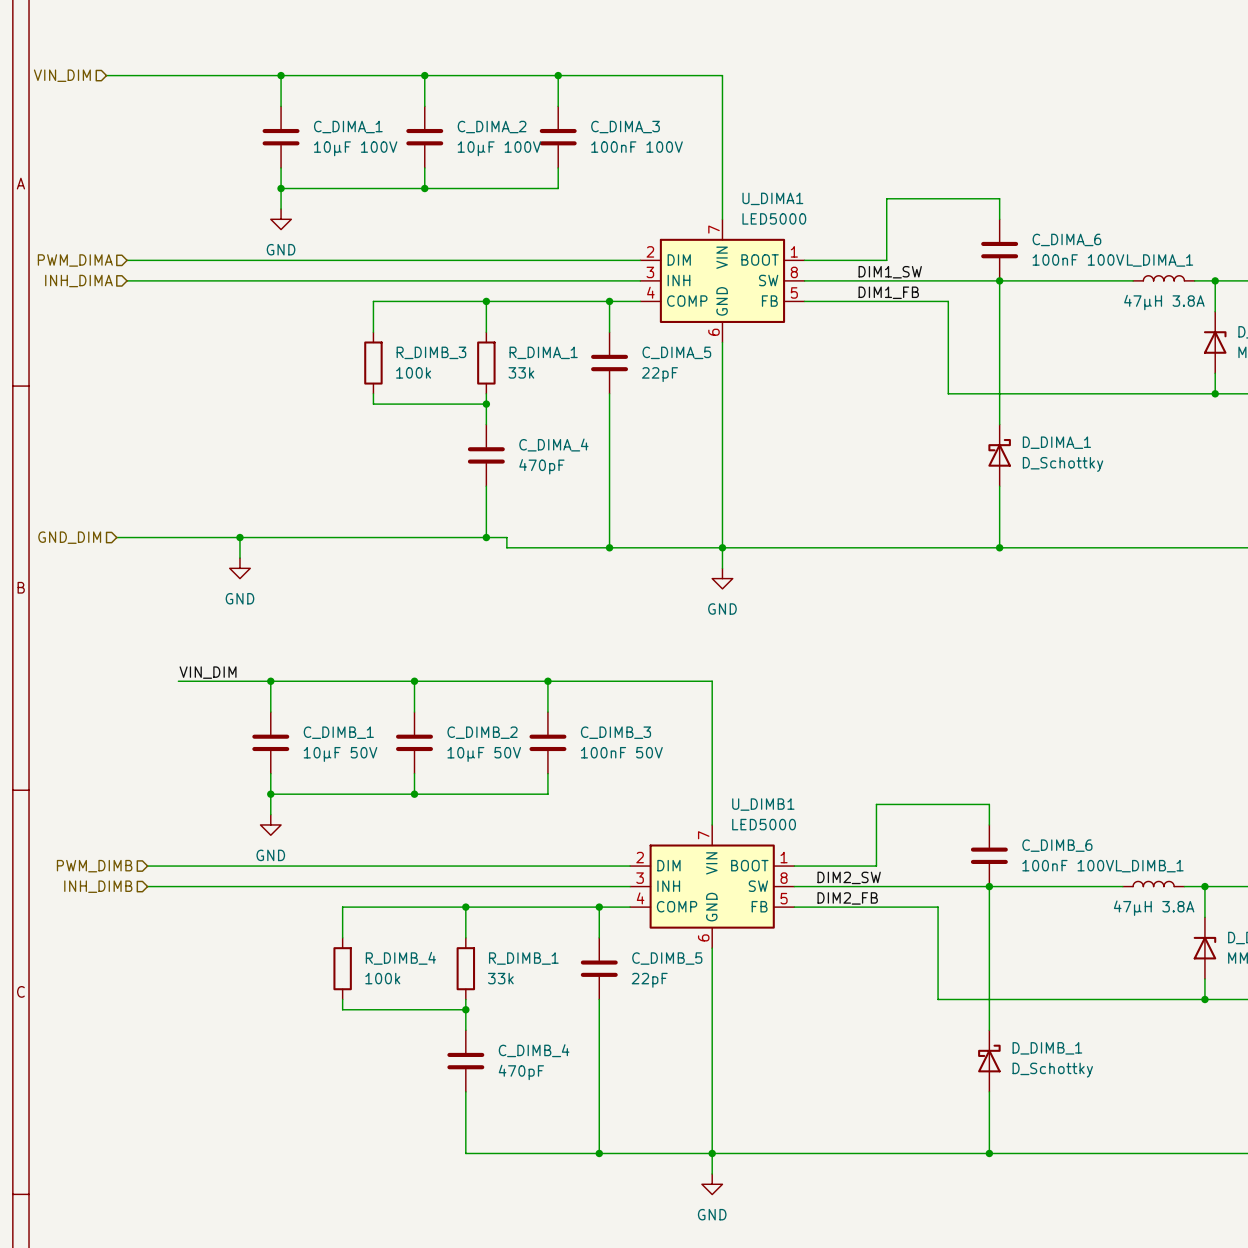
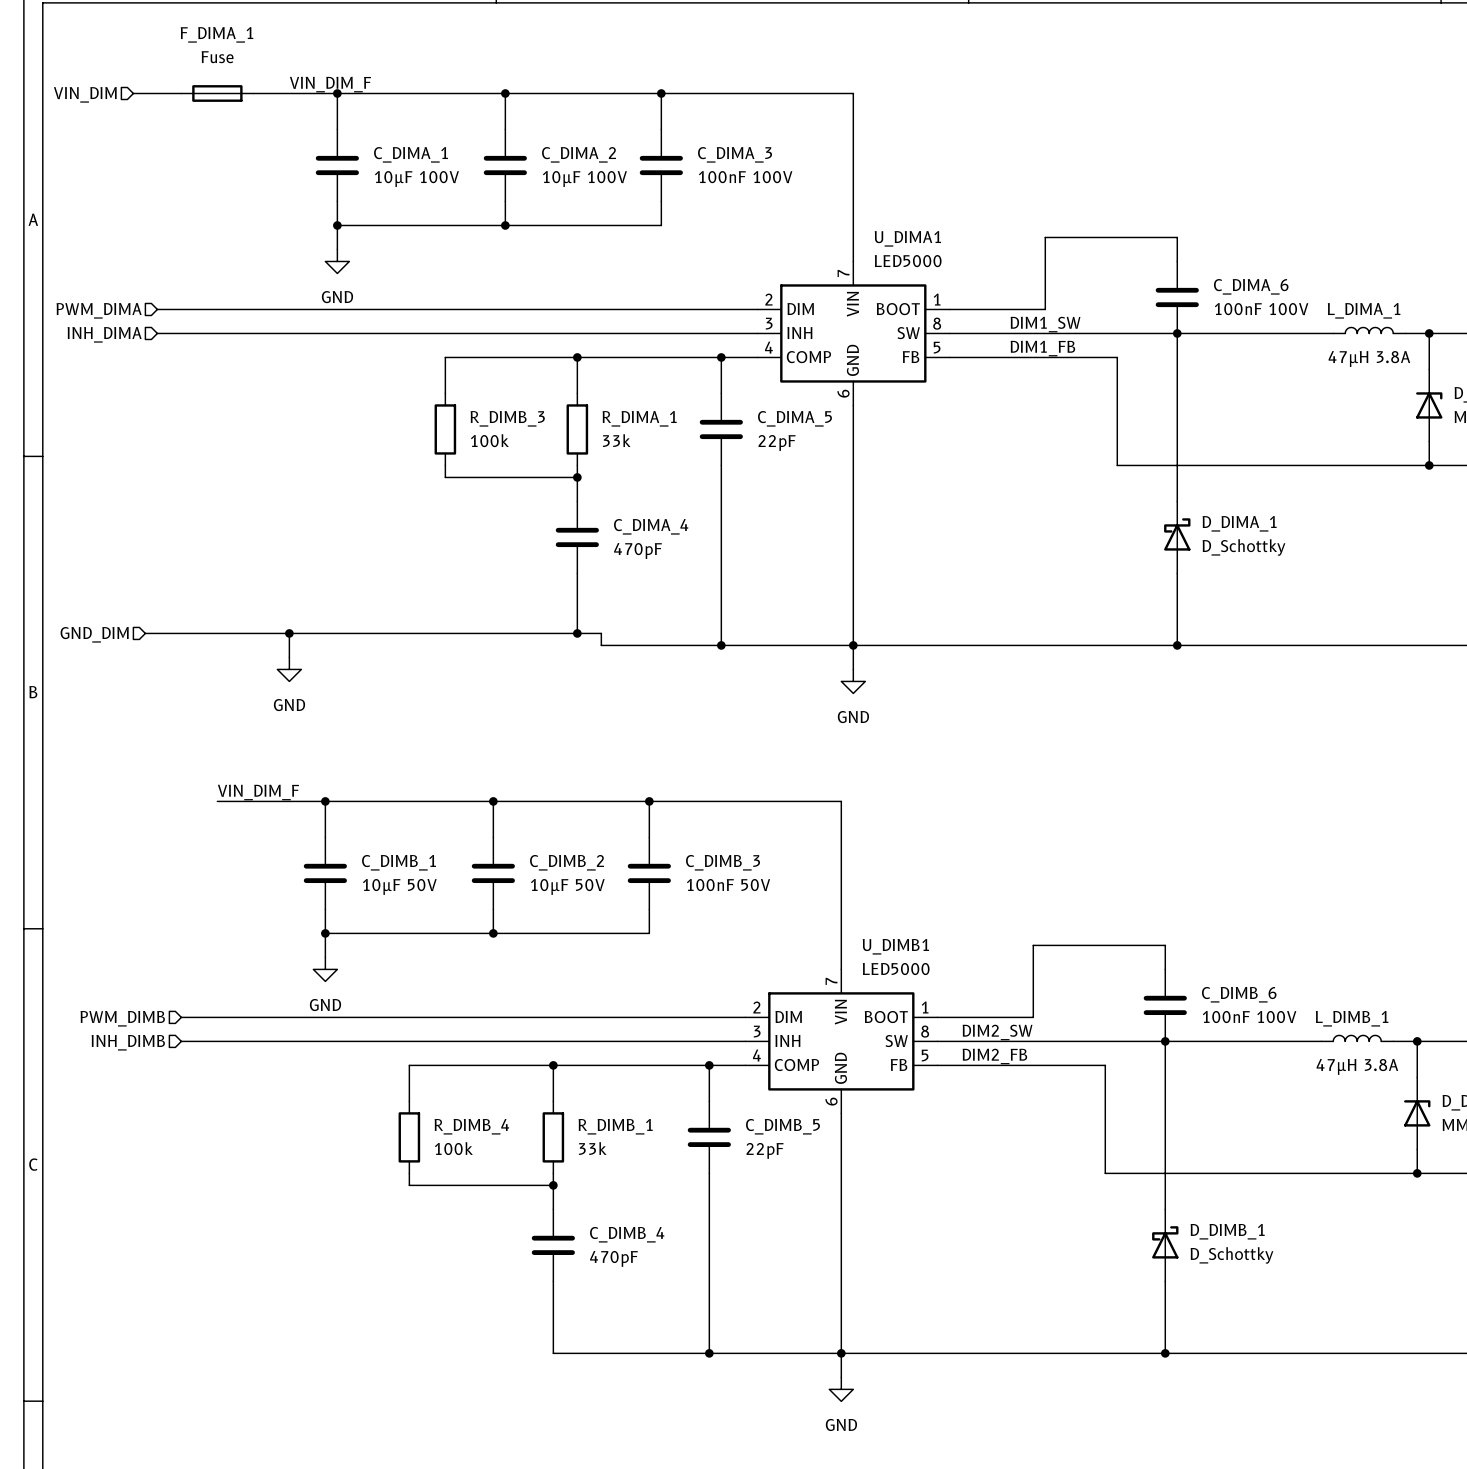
label: none -> VIN_DIM_F (330, 84)
F_DIMA_1: none -> Fuse (217, 93)
label: VIN_DIM (208, 672) -> VIN_DIM_F (258, 792)

